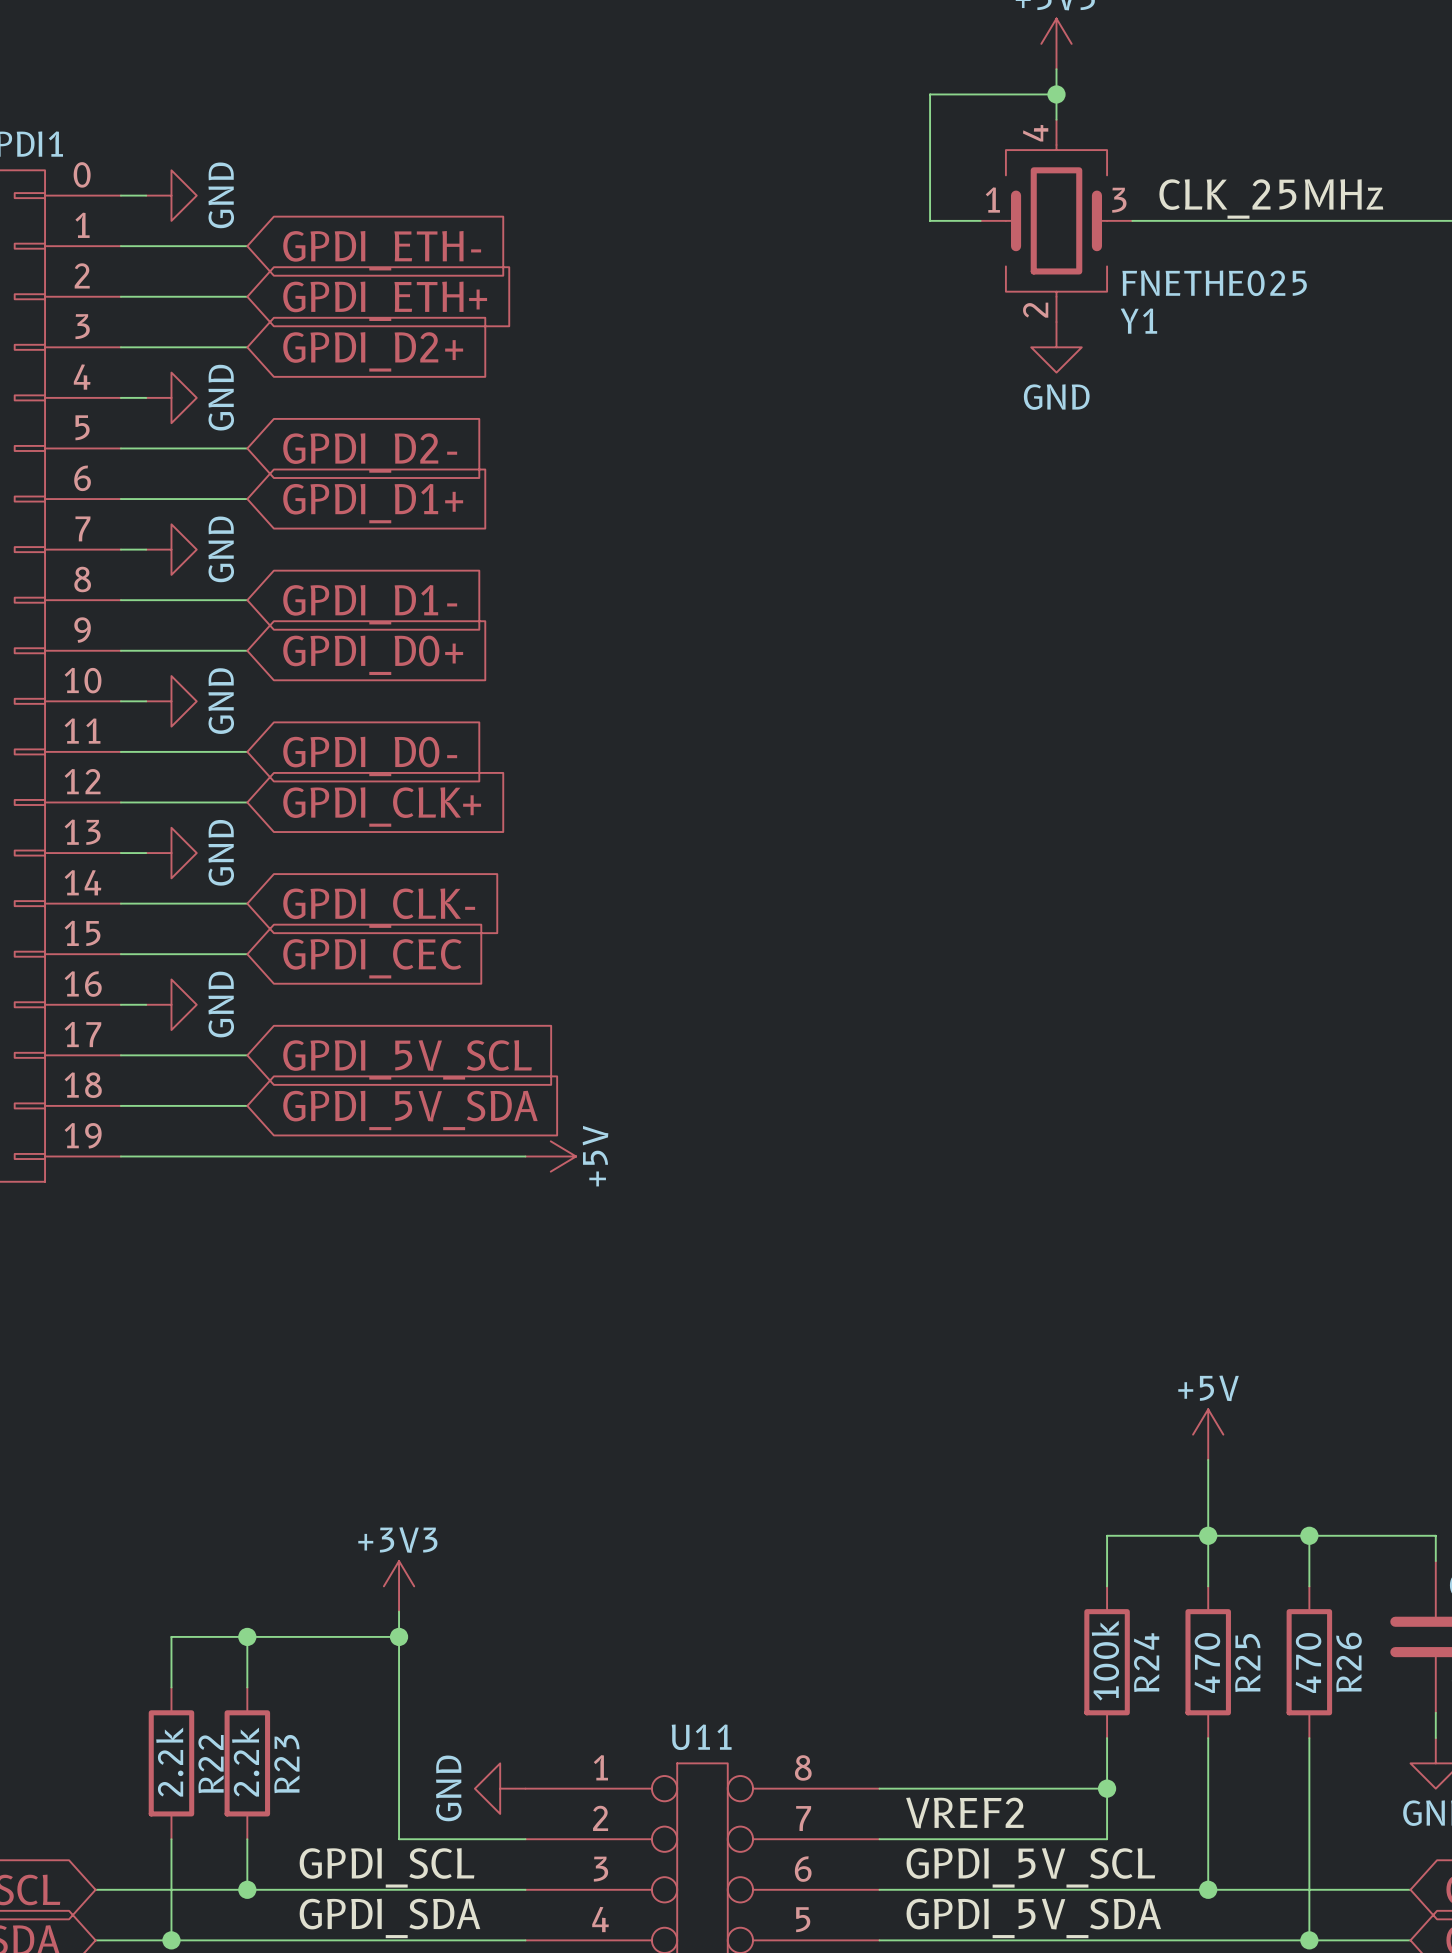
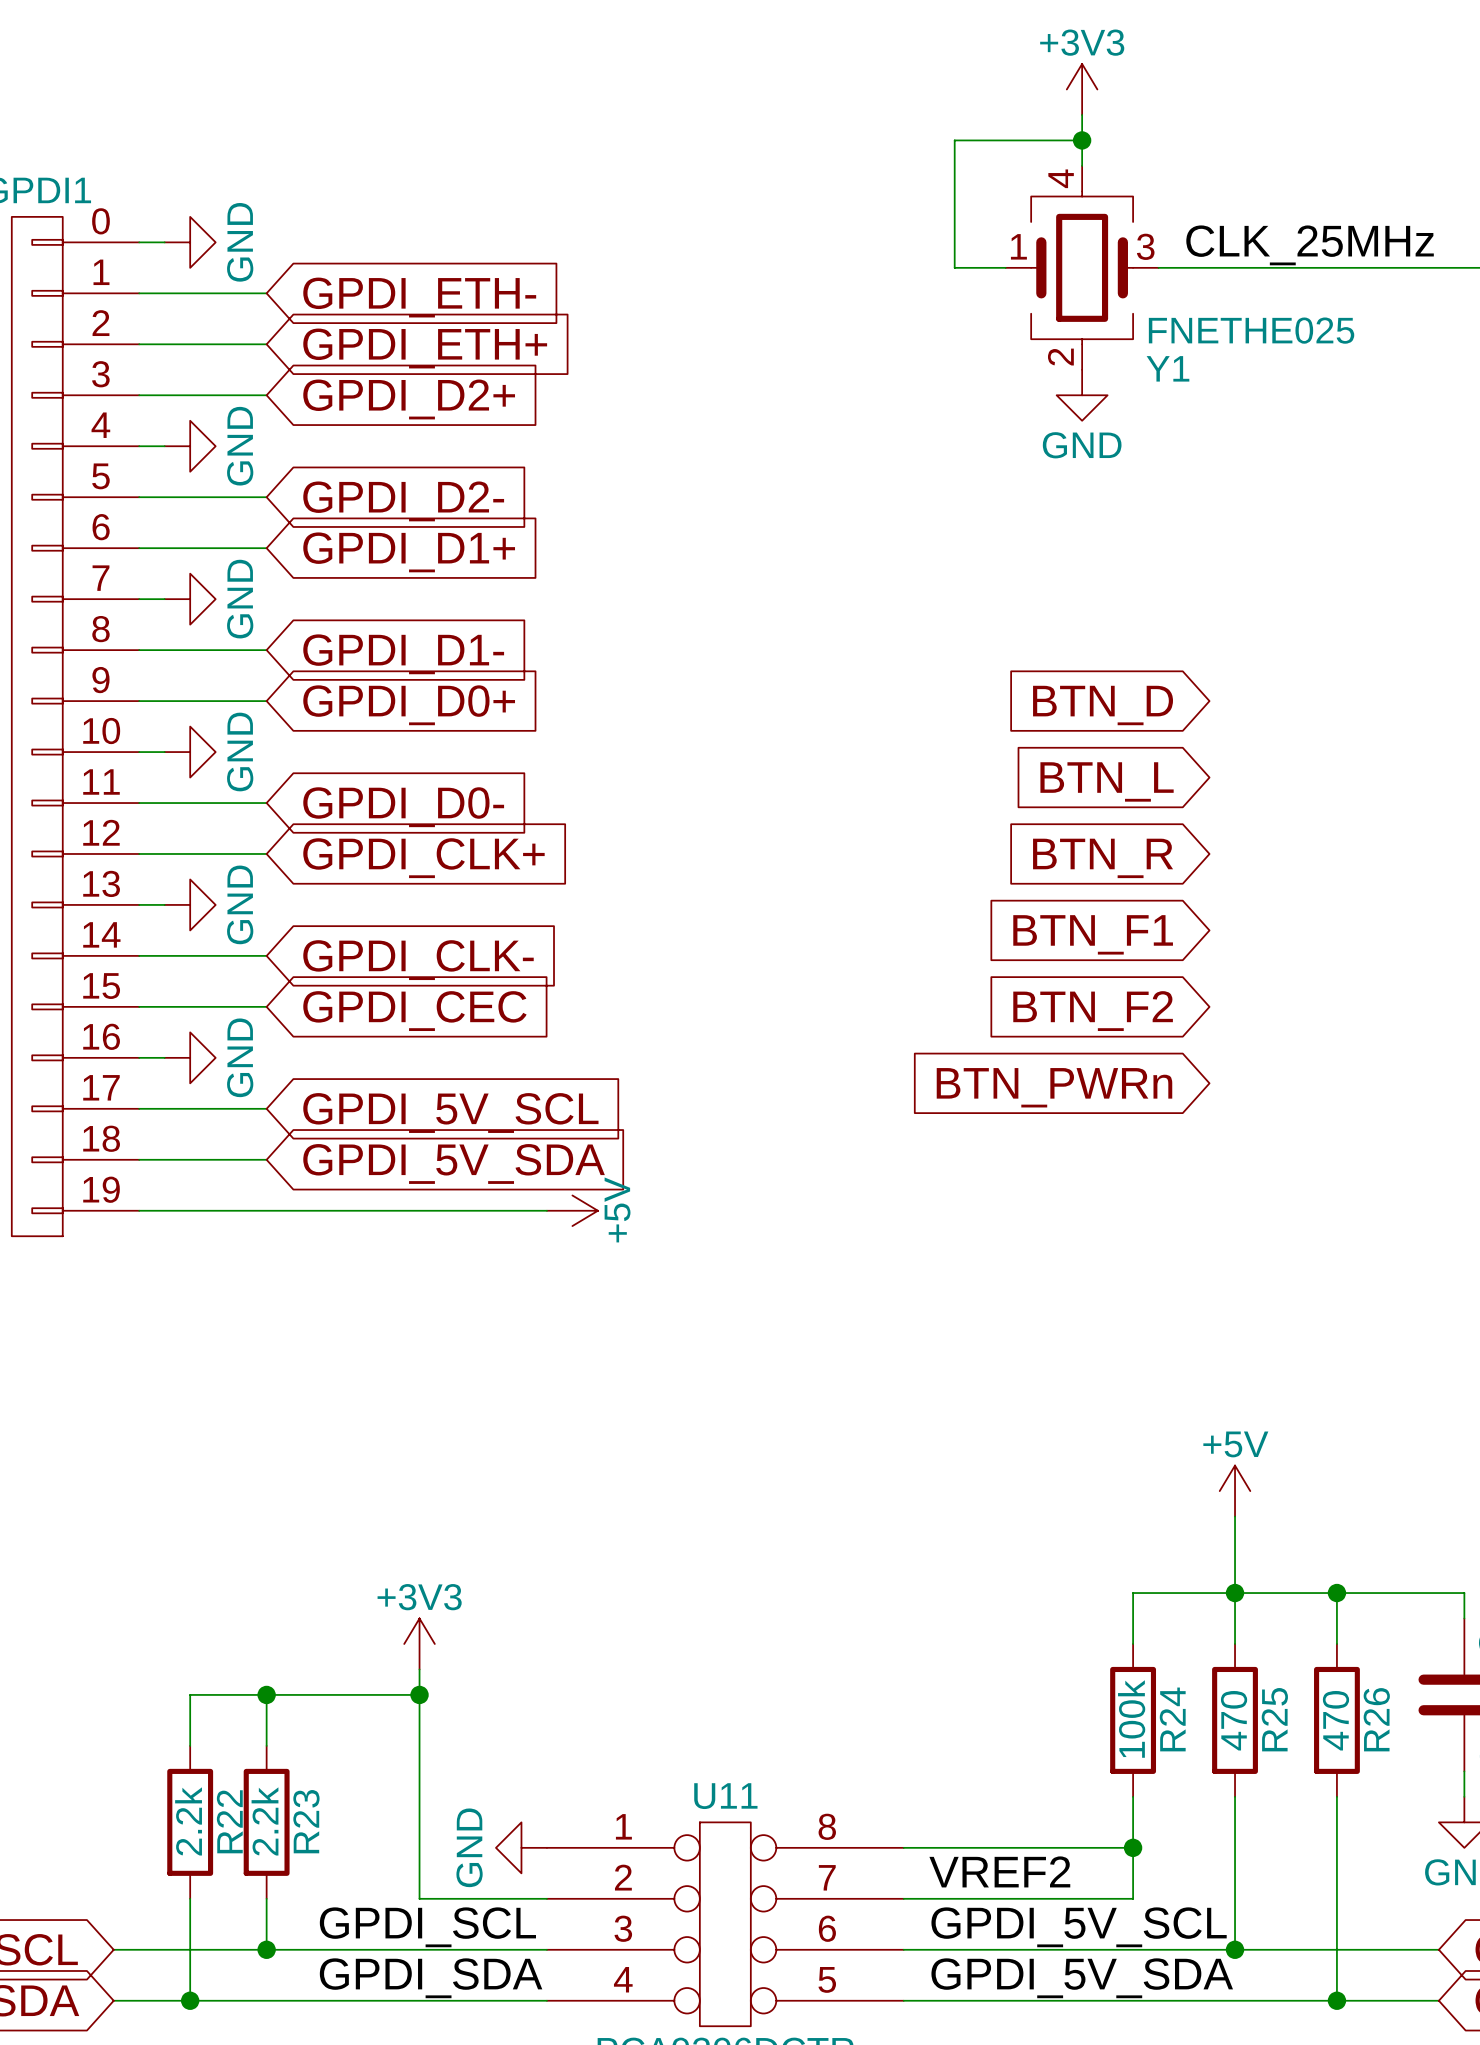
global label: none -> BTN_D (1103, 705)
global label: none -> BTN_L (1107, 781)
global label: none -> BTN_R (1103, 858)
global label: none -> BTN_F1 (1093, 934)
global label: none -> BTN_F2 (1093, 1011)
global label: none -> BTN_PWRn (1054, 1087)

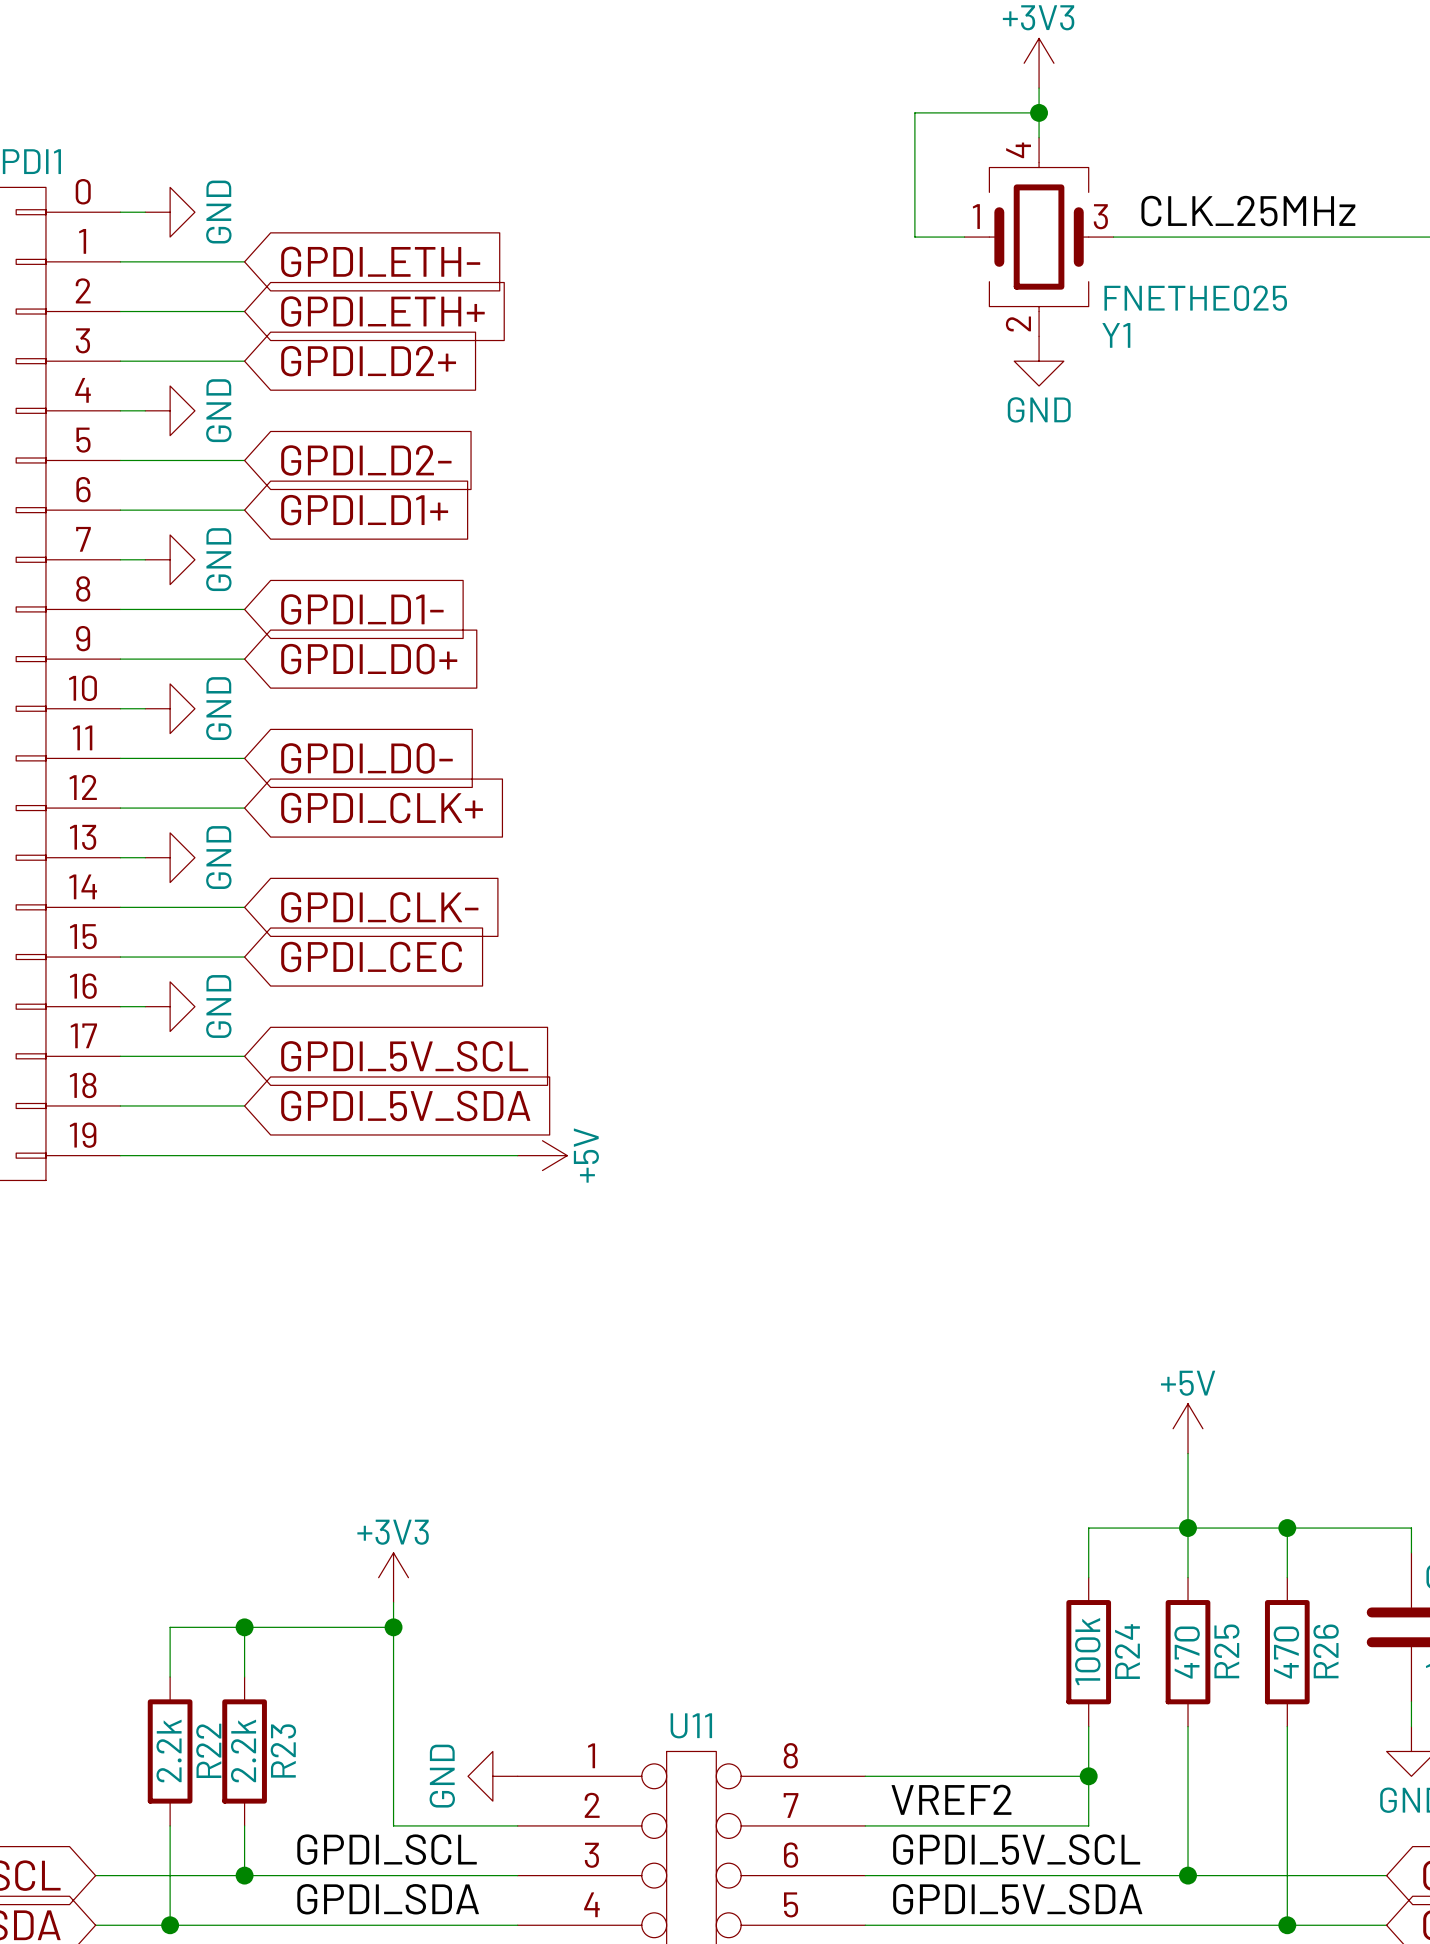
global label: BTN_D (1103, 705) -> none
global label: BTN_L (1107, 781) -> none
global label: BTN_R (1103, 858) -> none
global label: BTN_F1 (1093, 934) -> none
global label: BTN_F2 (1093, 1011) -> none
global label: BTN_PWRn (1054, 1087) -> none

